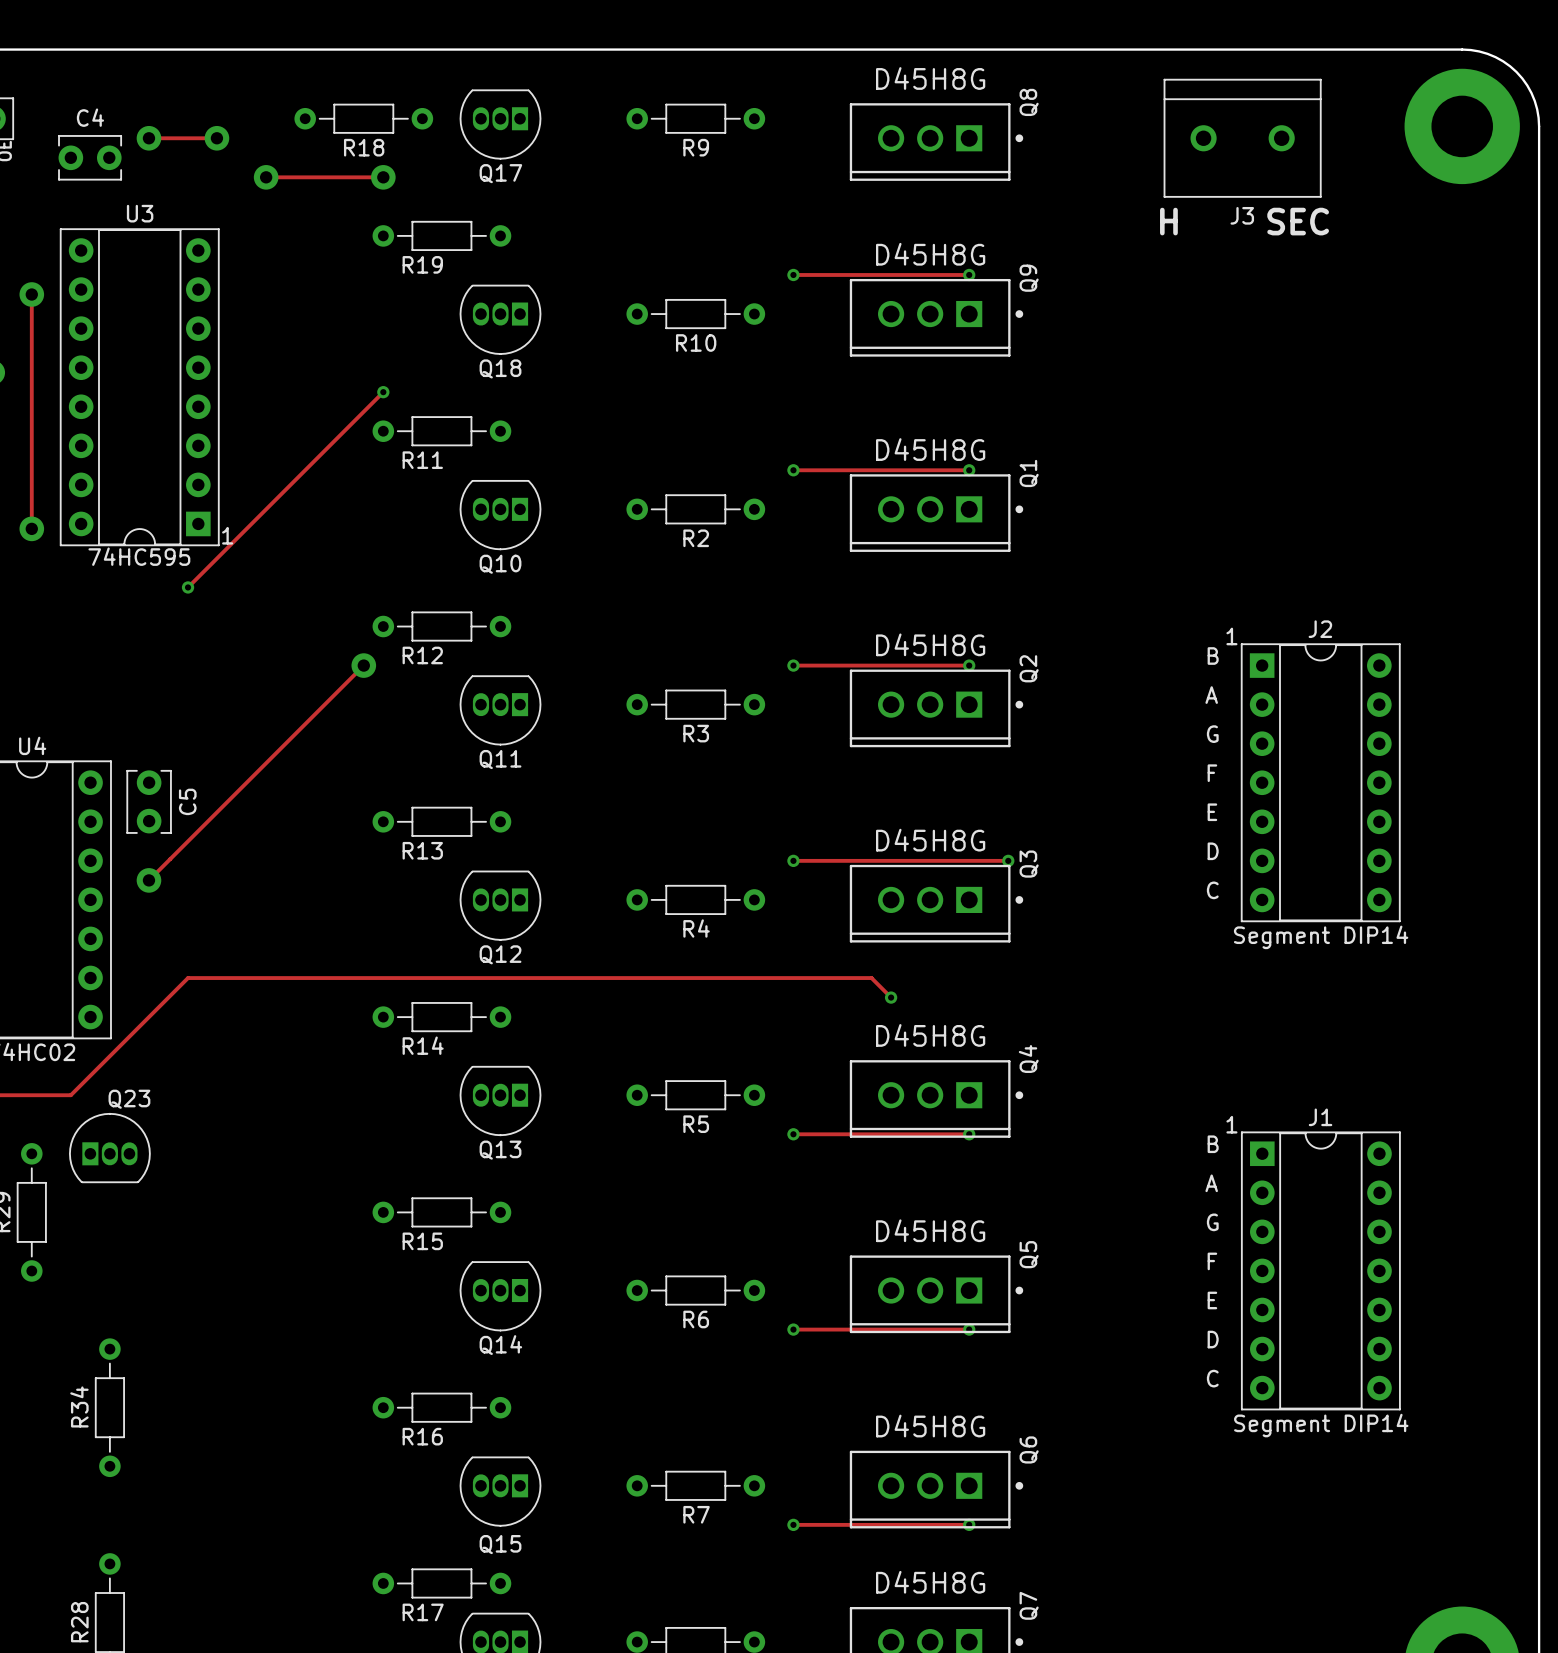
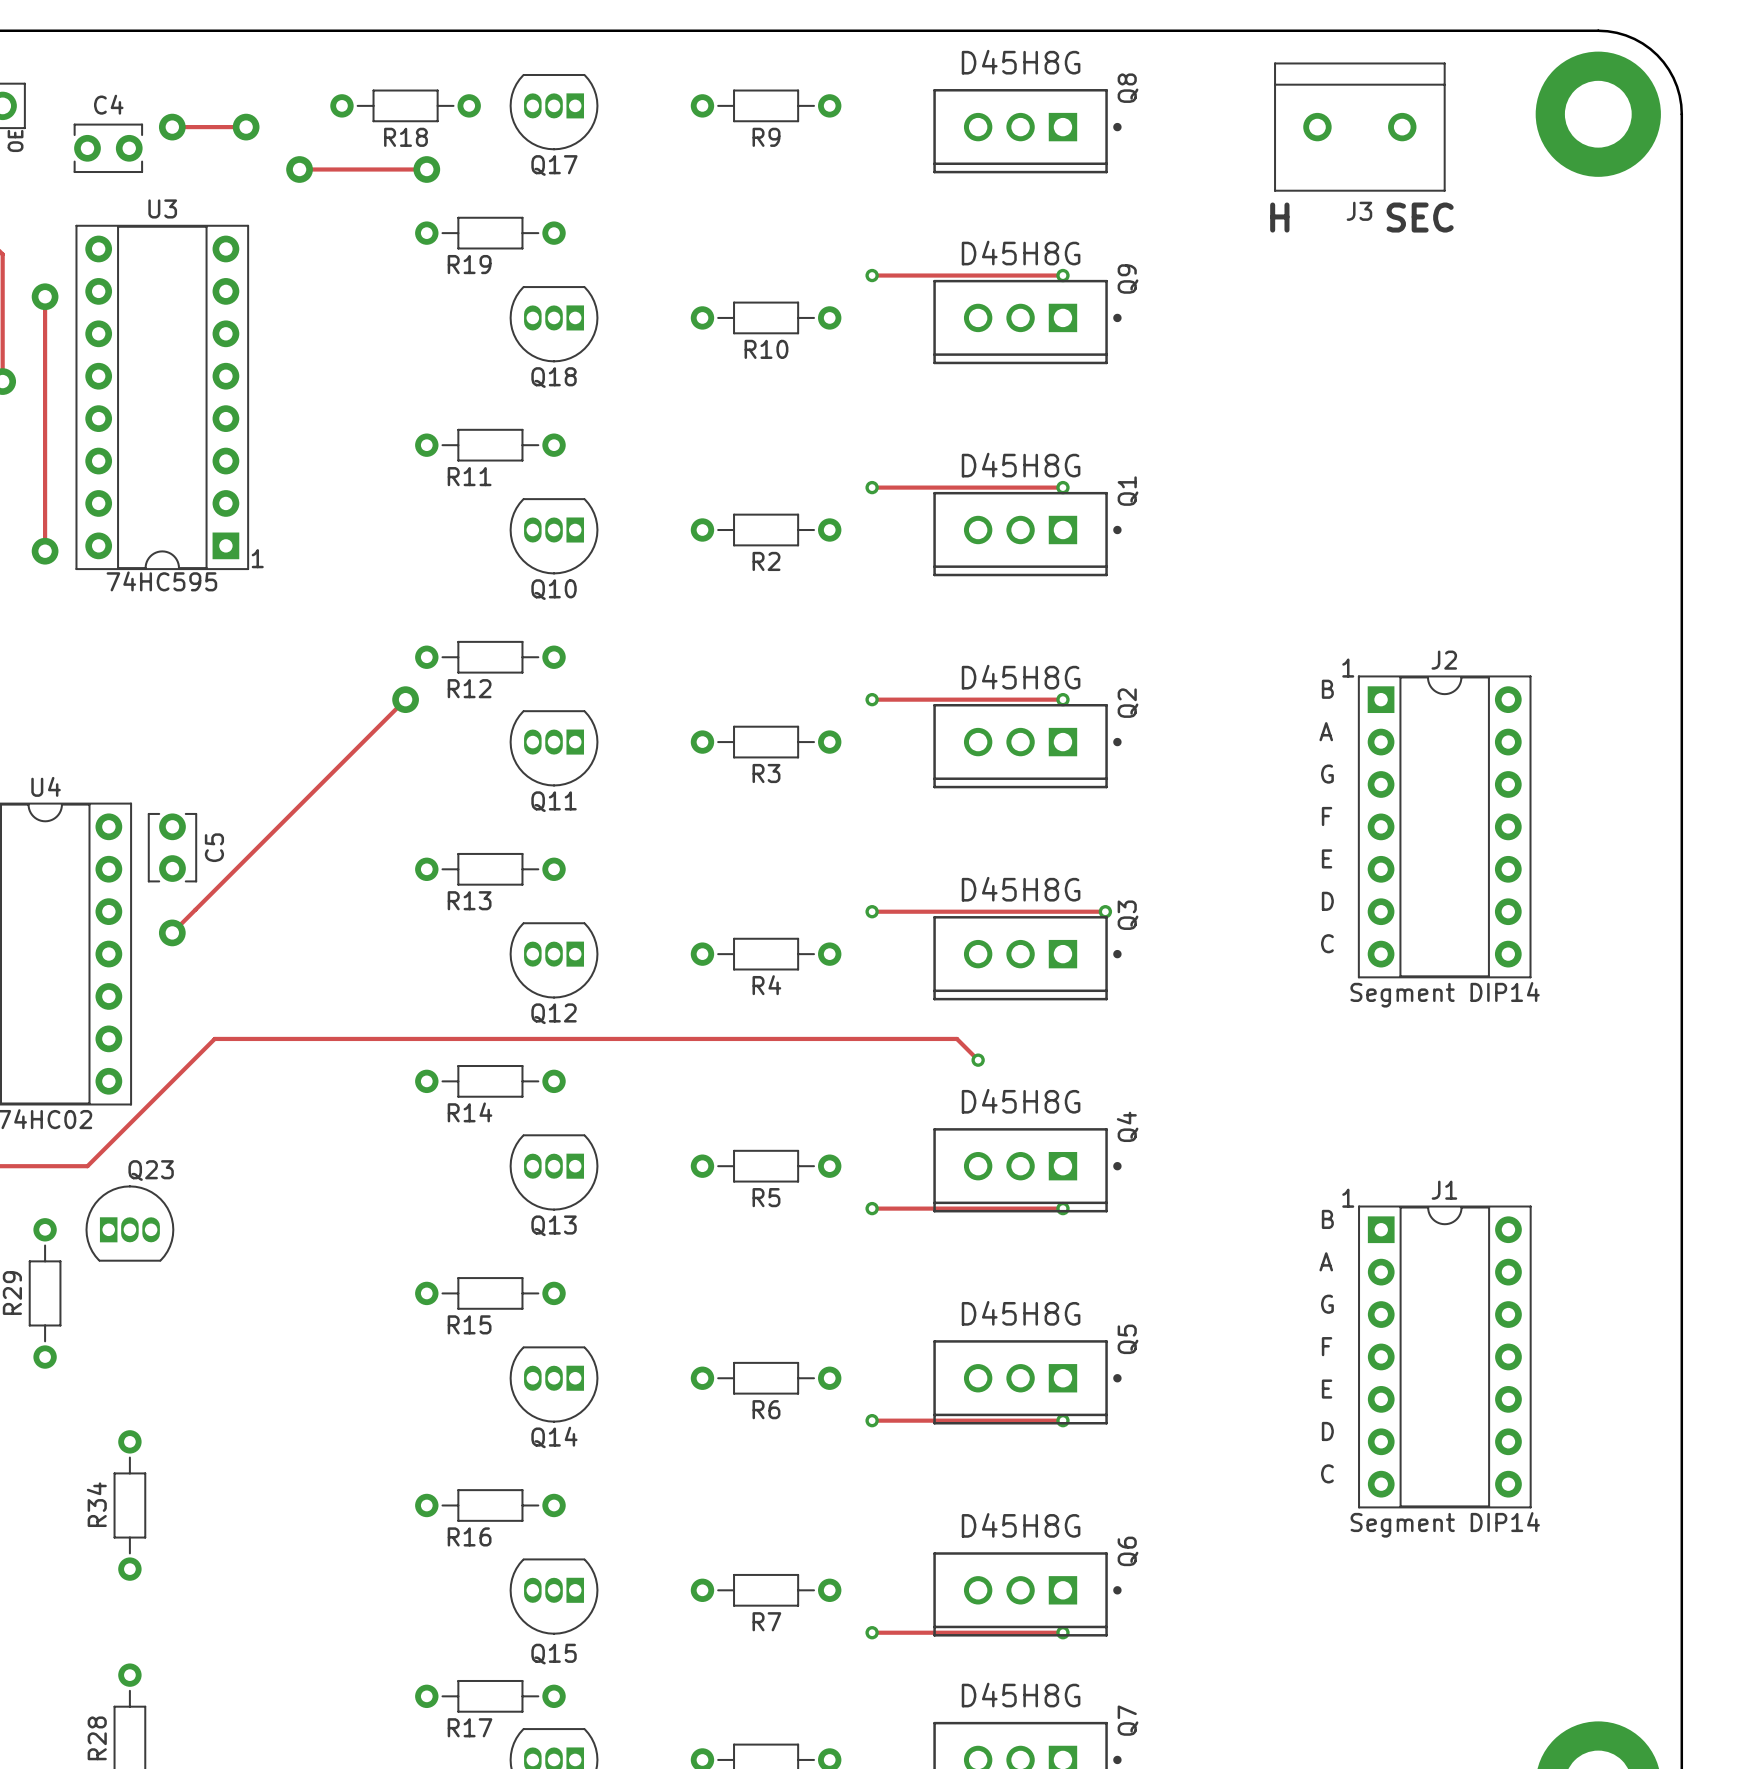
track: (383, 392) (188, 587) -> none
via: (383, 392) -> none
via: (188, 587) -> none

